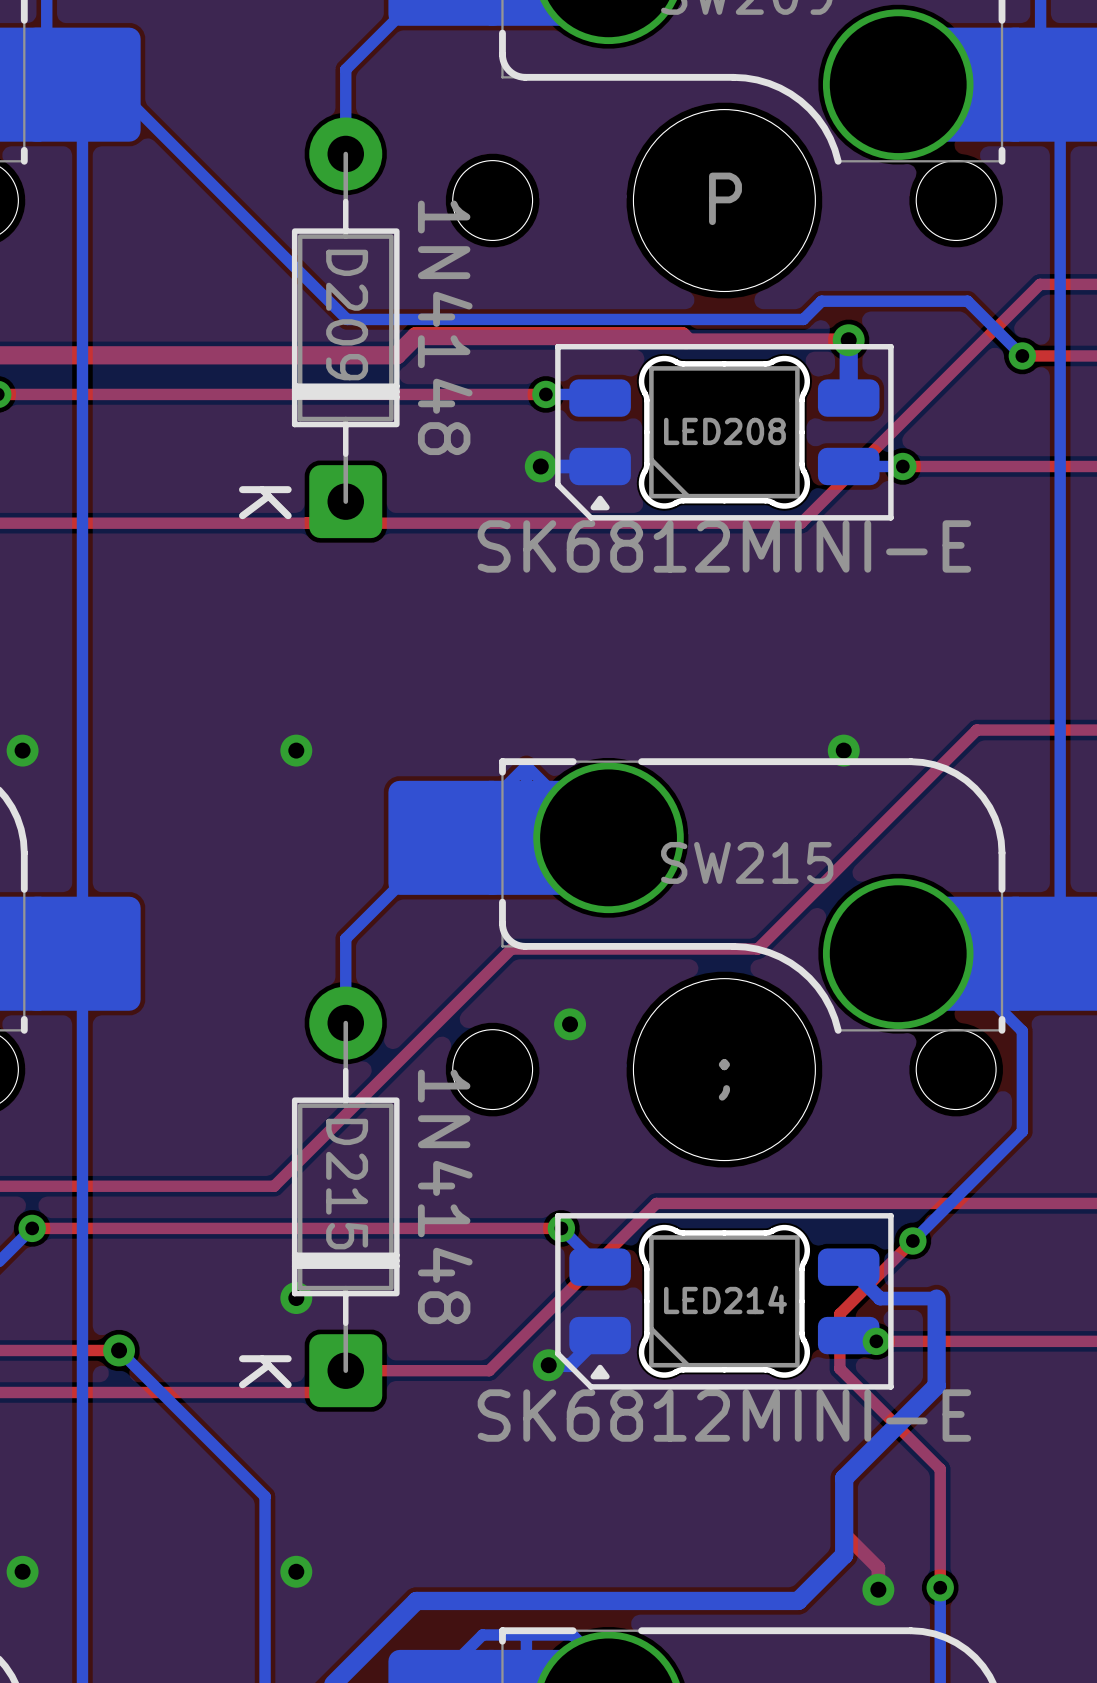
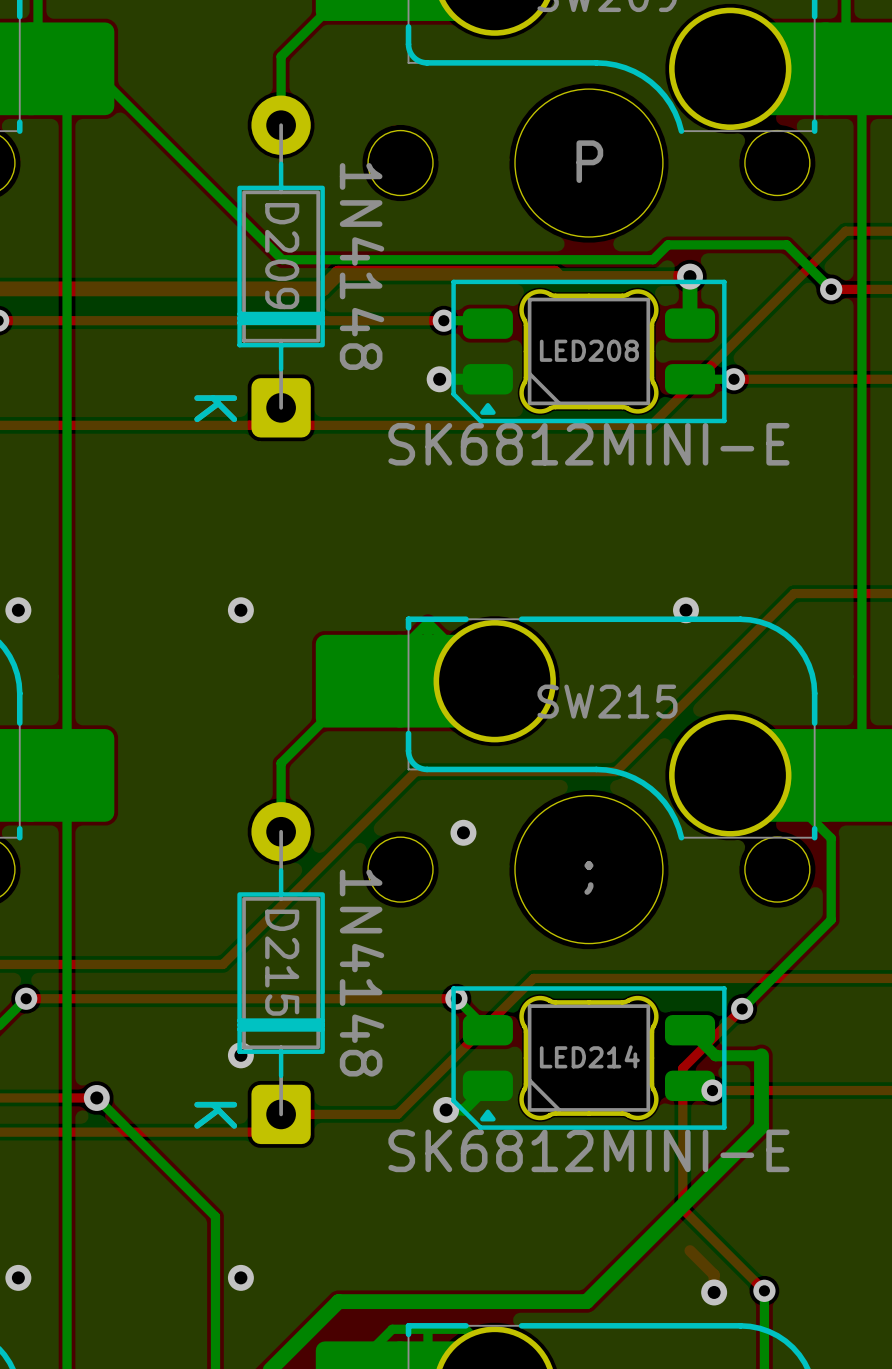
top track: (839, 1368) (940, 1469) (940, 1587) -> (682, 1112) (682, 1209) (764, 1290)
bottom track: (844, 1478) (844, 1554) (798, 1600) (721, 1600) -> (686, 1201) (586, 1301)

